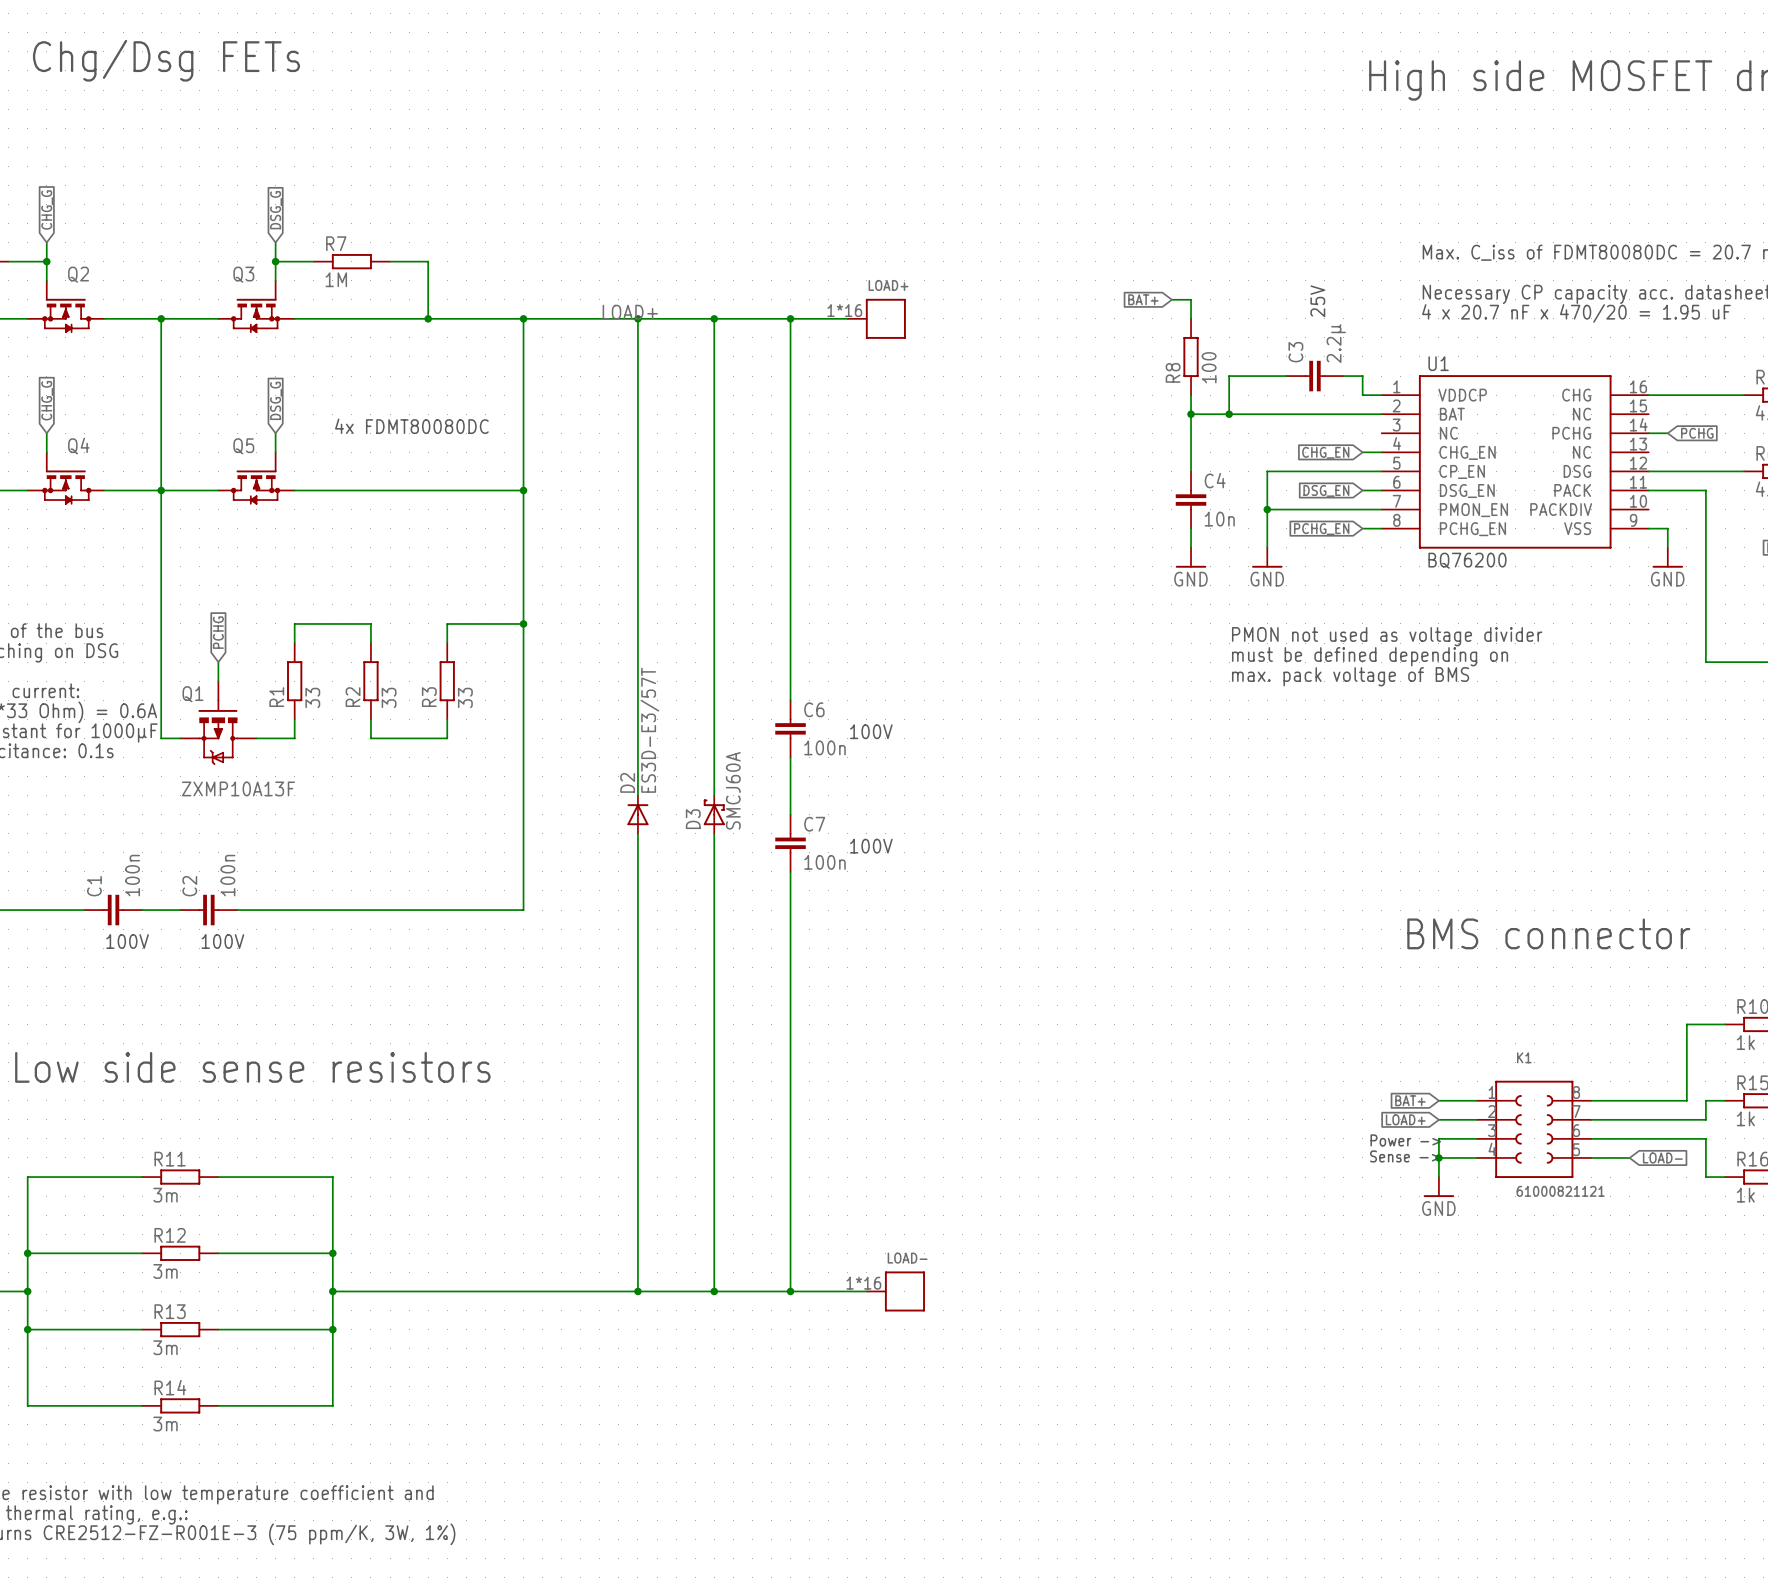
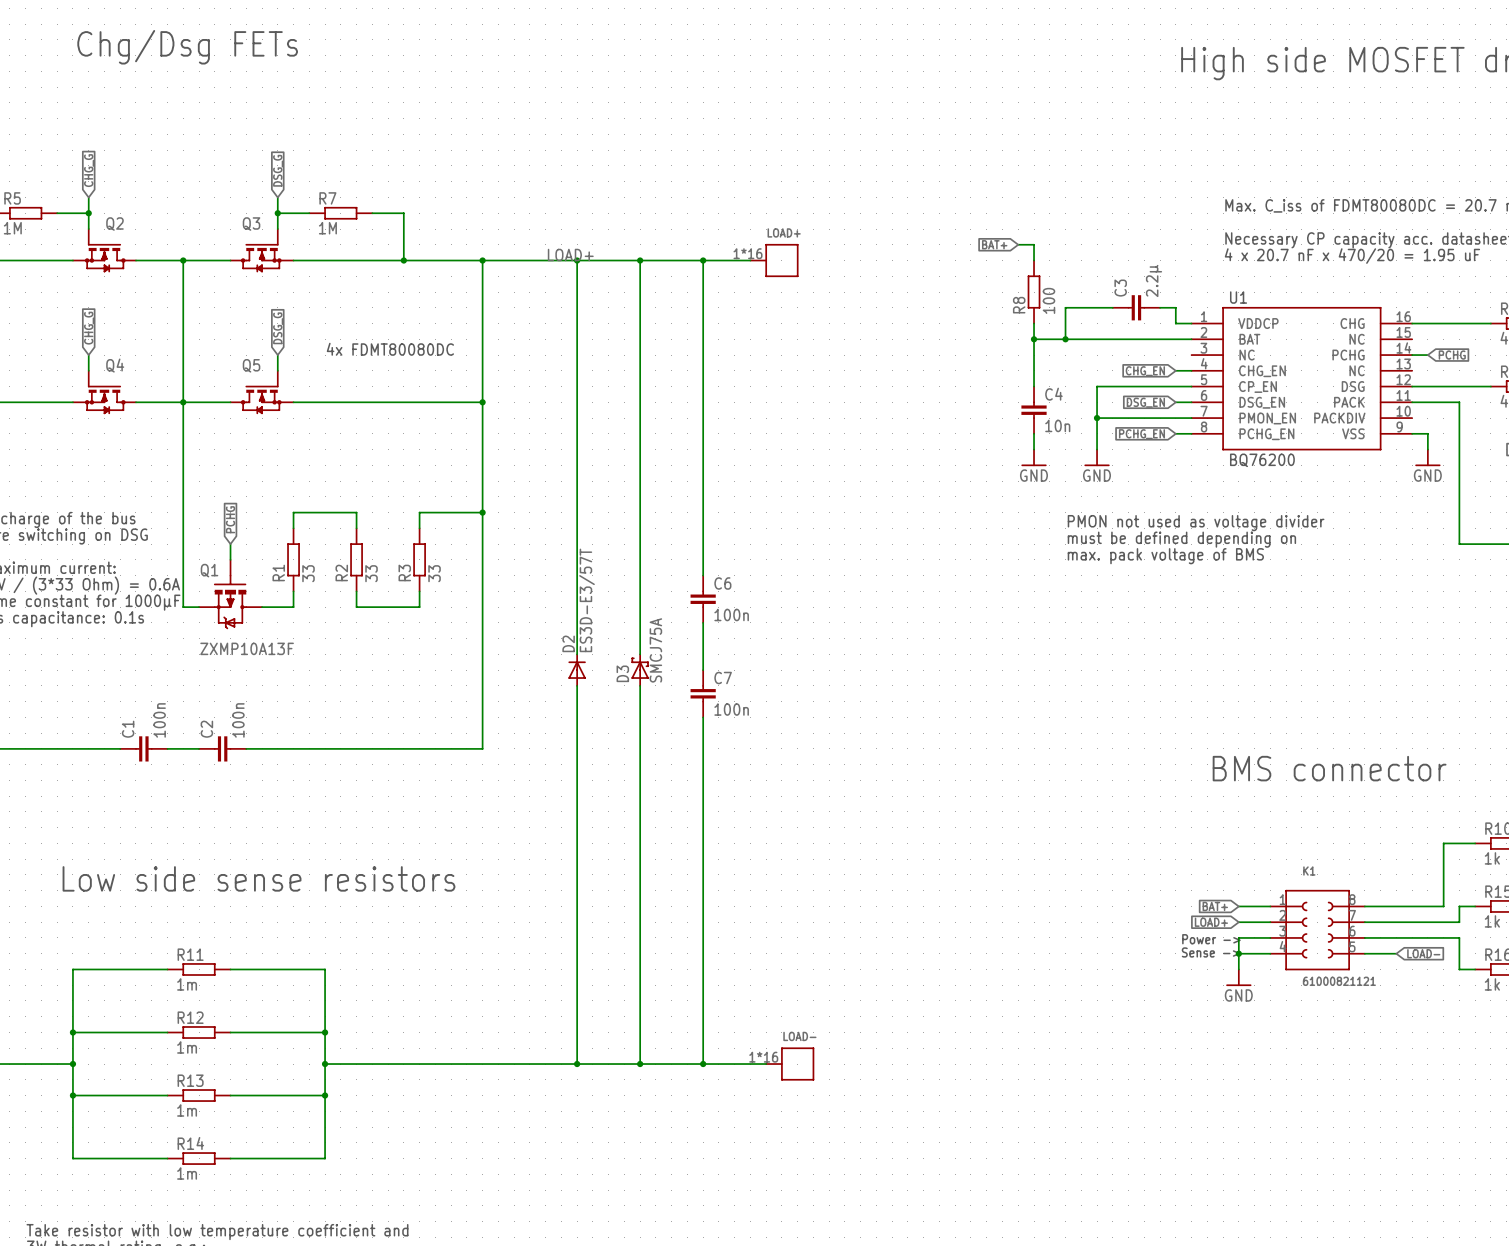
text: 25V (1317, 301) -> none
text: 100V (871, 731) -> none
D3 value: SMCJ60A (733, 790) -> SMCJ75A (655, 650)
text: 100V (871, 846) -> none
text: 100V (127, 941) -> none
text: 100V (222, 941) -> none
R11 value: 3m (165, 1195) -> 1m (187, 984)
R12 value: 3m (165, 1271) -> 1m (187, 1047)
R13 value: 3m (165, 1347) -> 1m (187, 1110)
R14 value: 3m (165, 1424) -> 1m (187, 1173)

